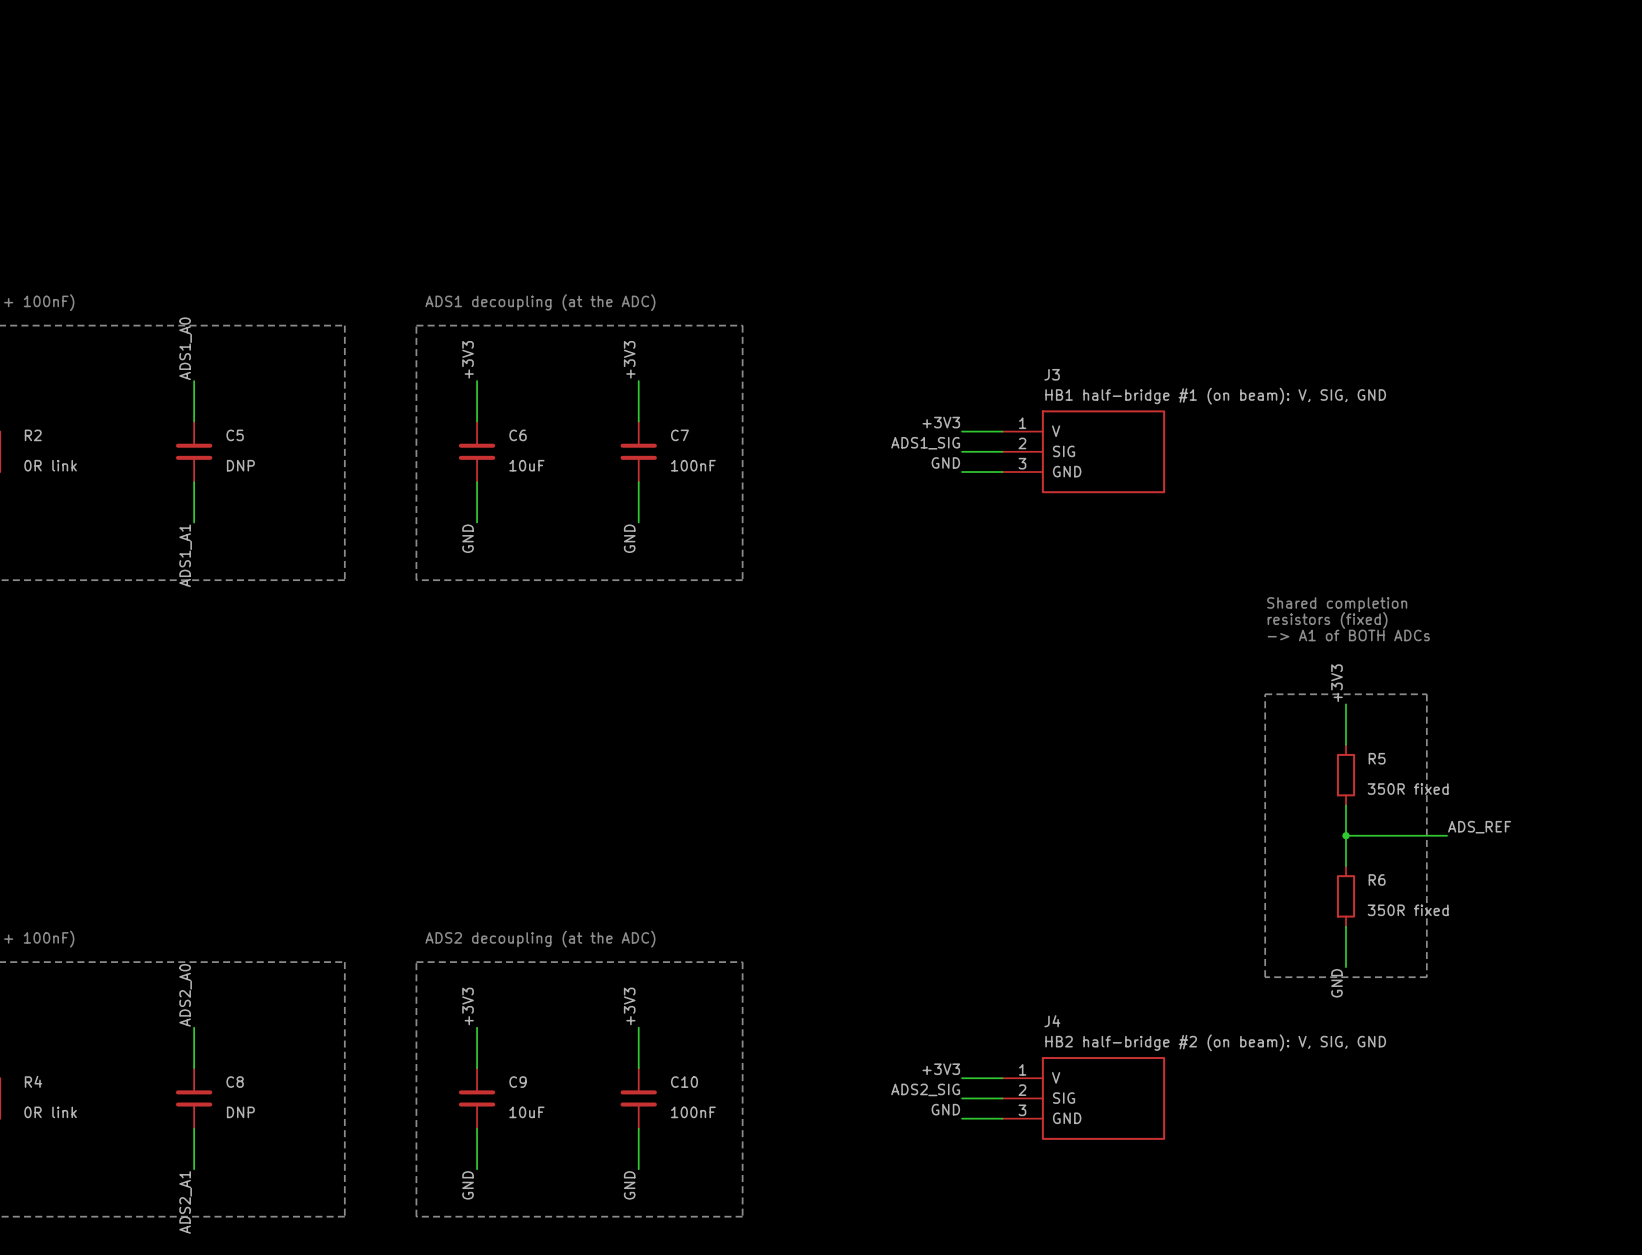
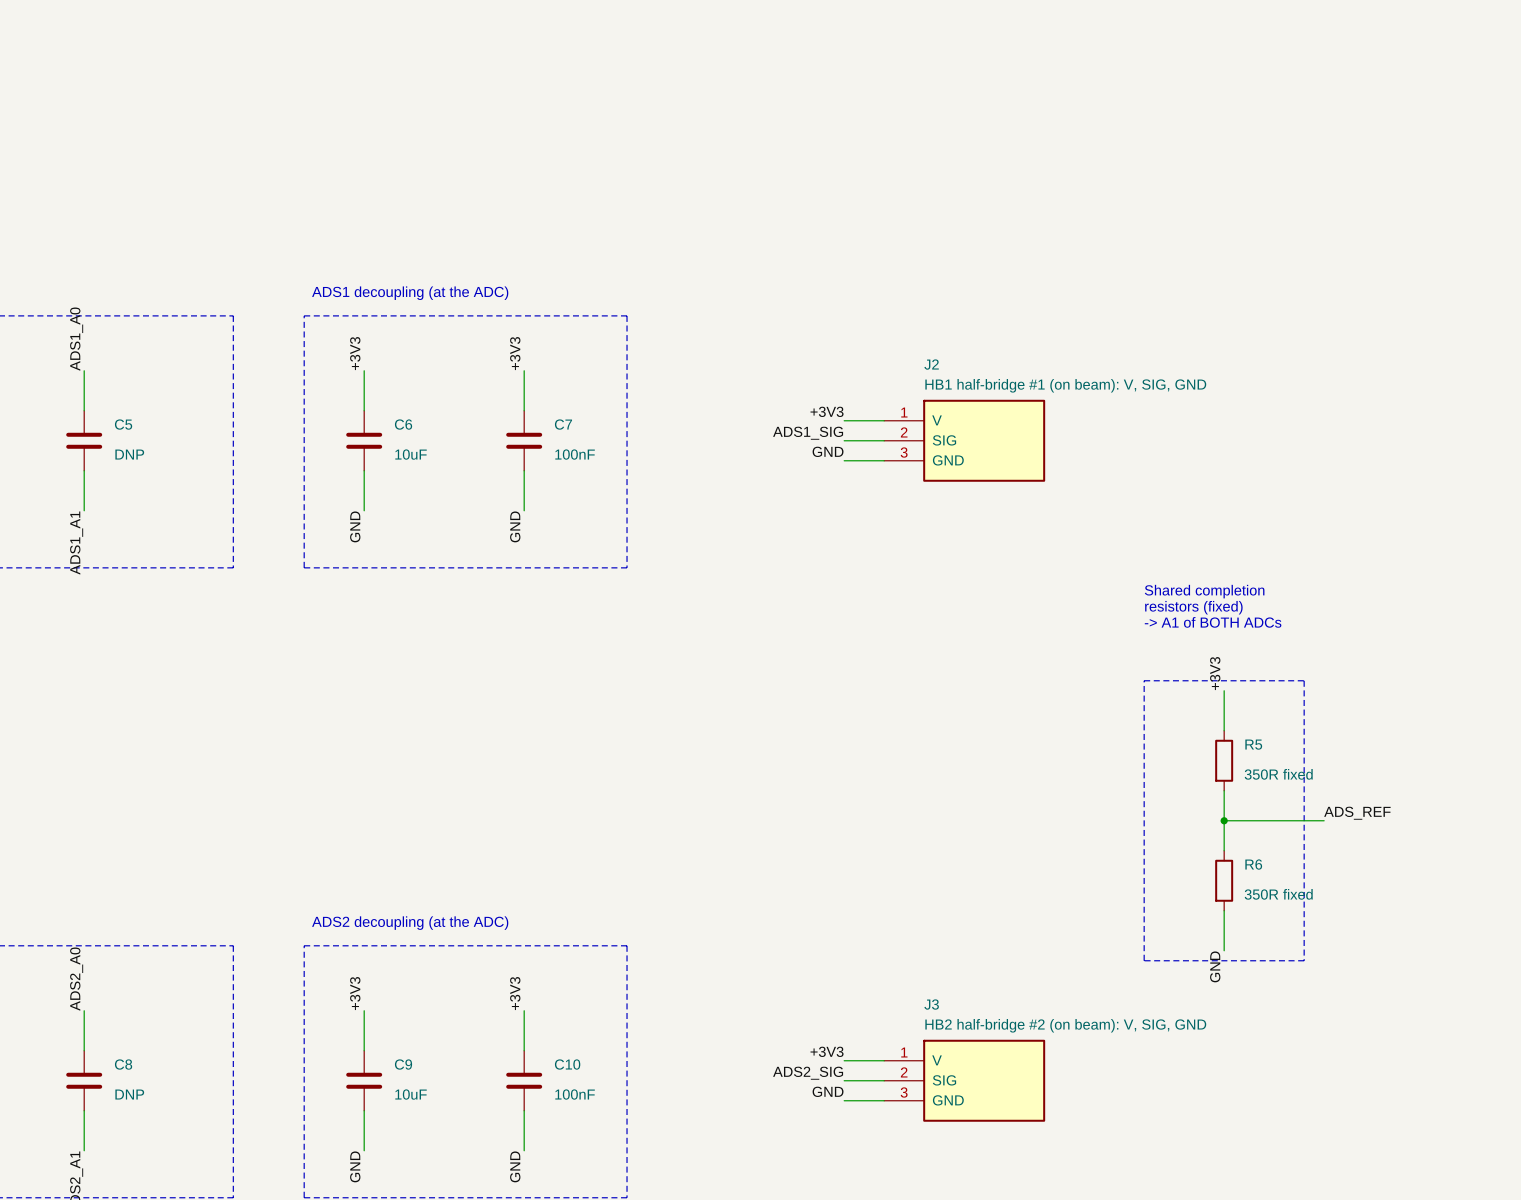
J3 name: J3 (1052, 374) -> J2 (931, 364)
J4 name: J4 (1052, 1021) -> J3 (931, 1004)

